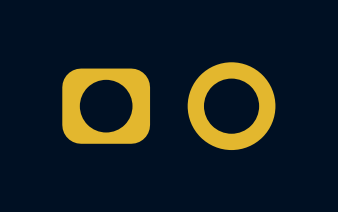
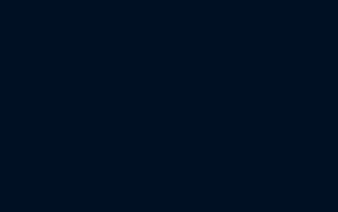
part: (168, 106) -> none

